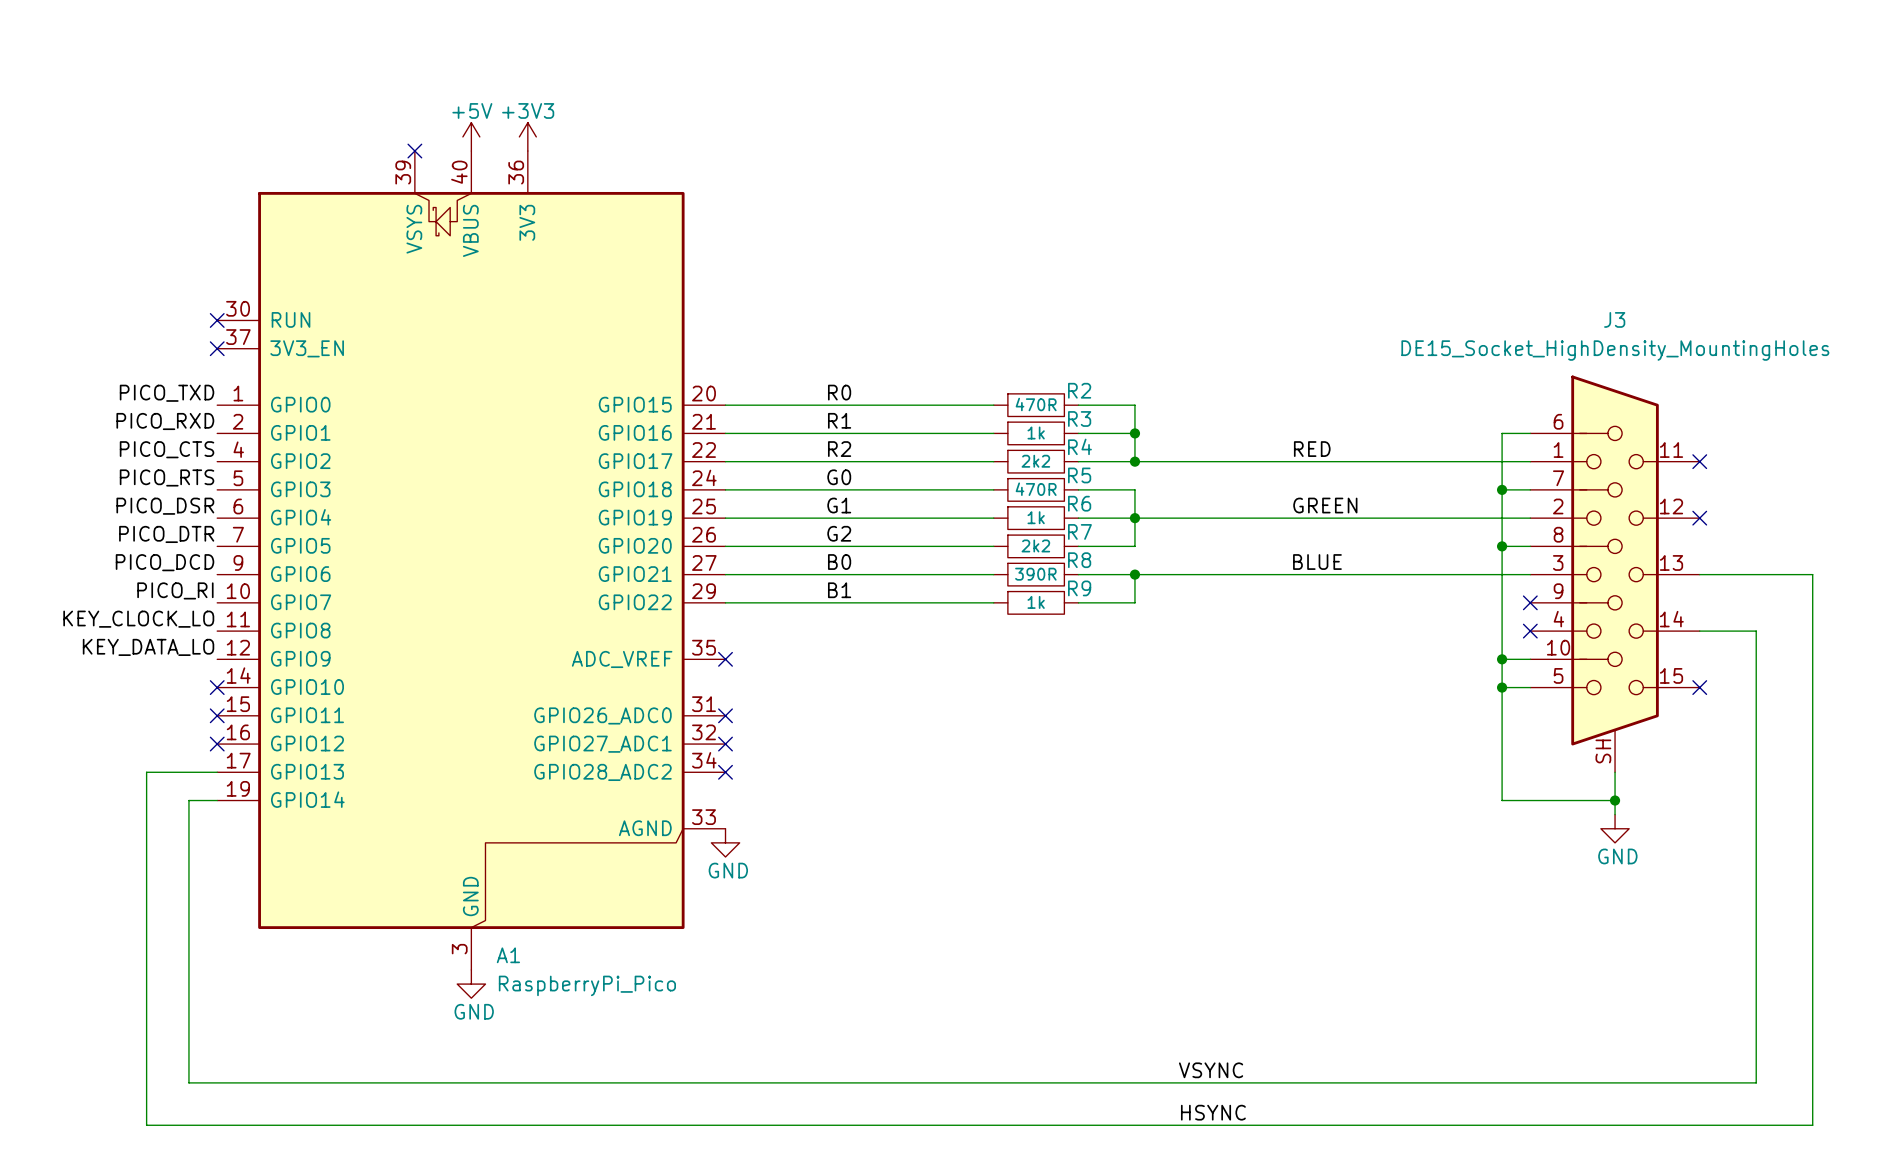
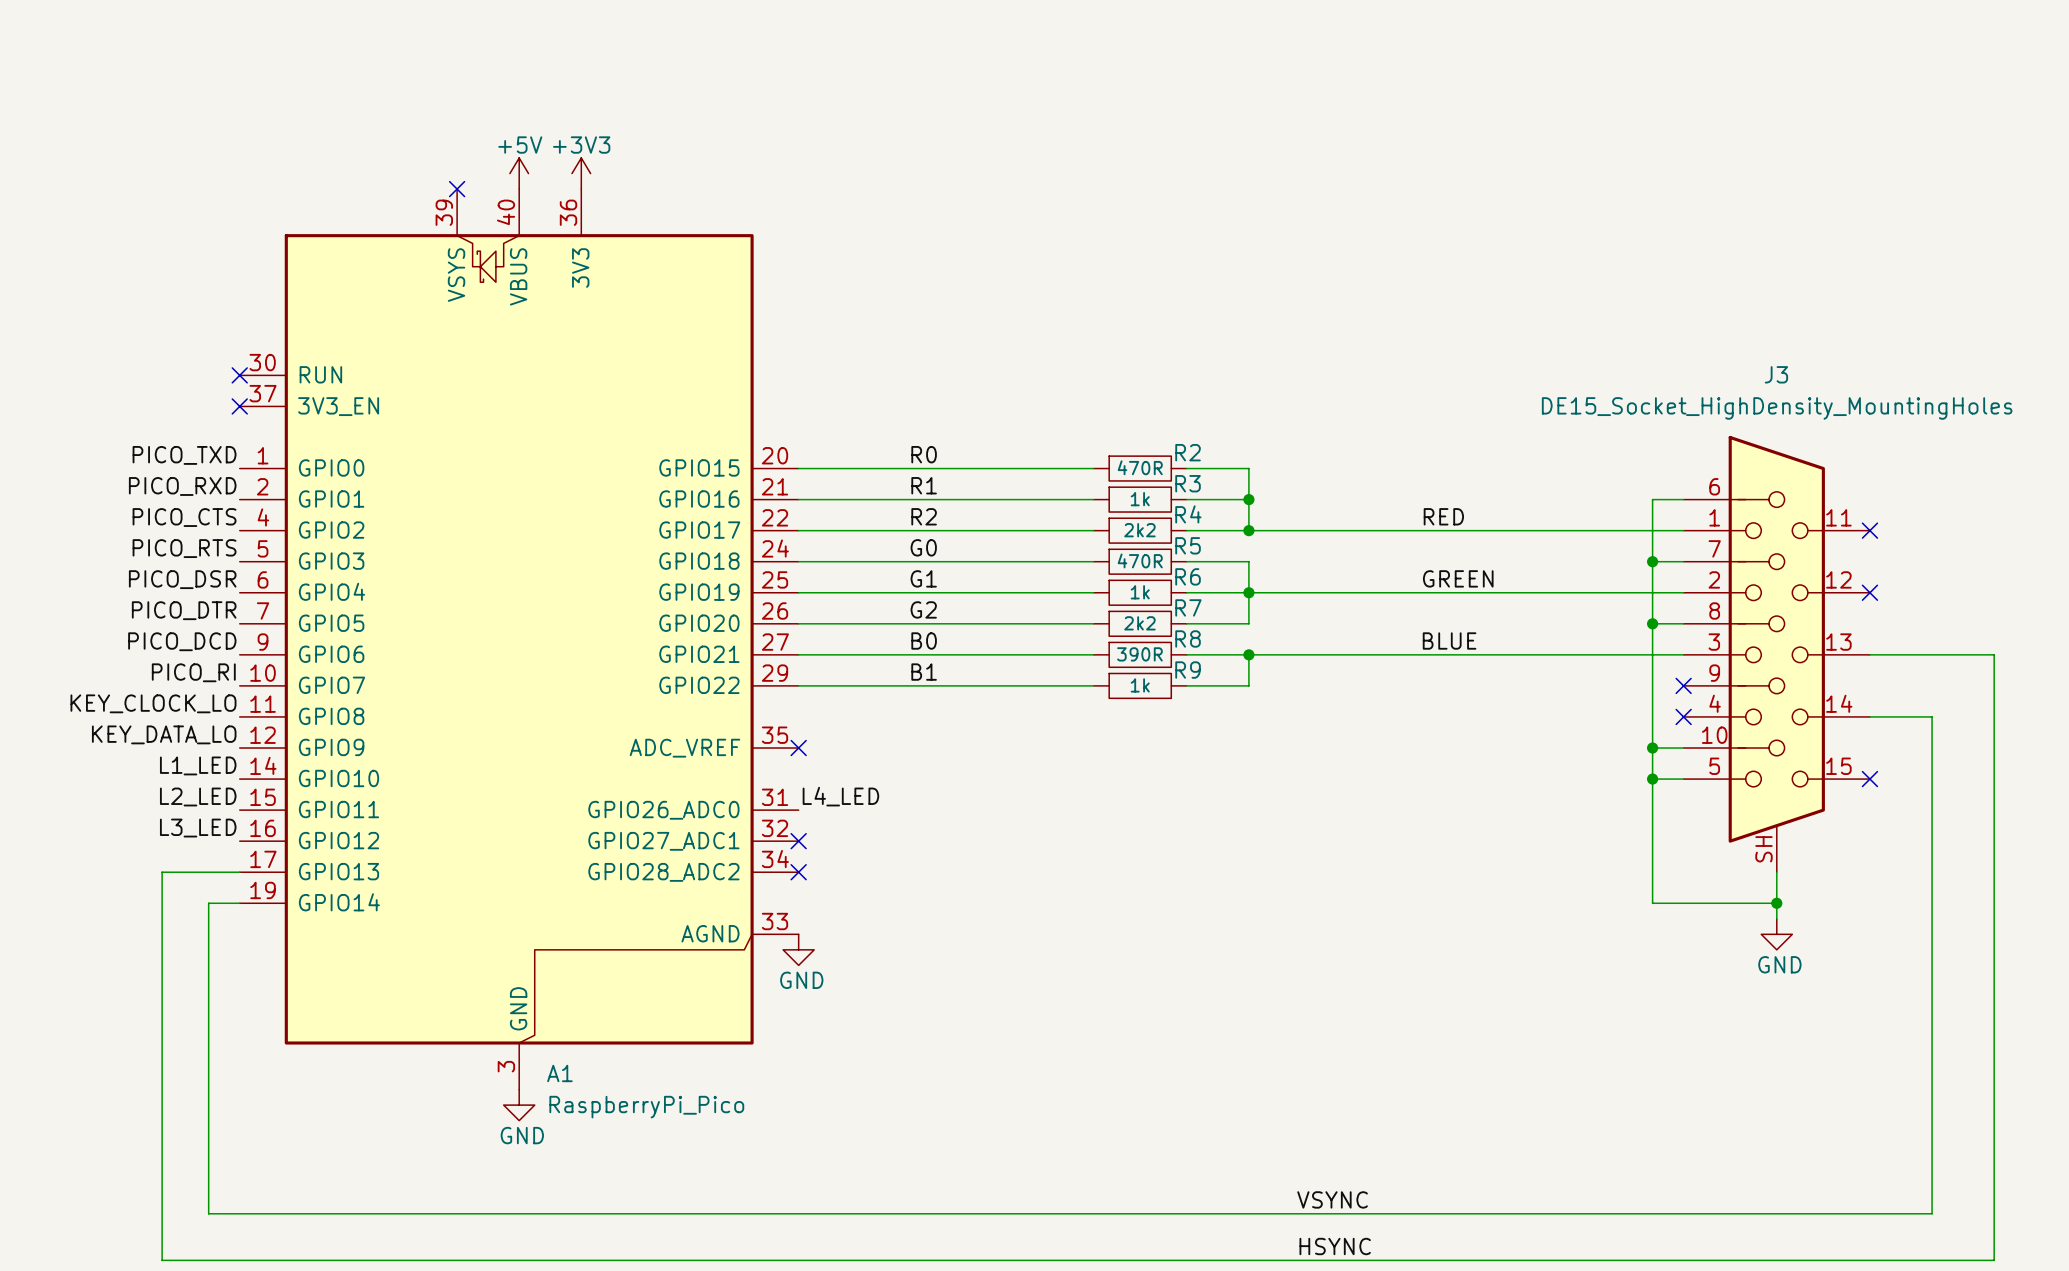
label: none -> L1_LED (198, 765)
no-connect mark: (217, 687) -> none
label: none -> L2_LED (198, 797)
label: none -> L4_LED (840, 796)
no-connect mark: (217, 715) -> none
no-connect mark: (725, 715) -> none
label: none -> L3_LED (198, 828)
no-connect mark: (217, 744) -> none

